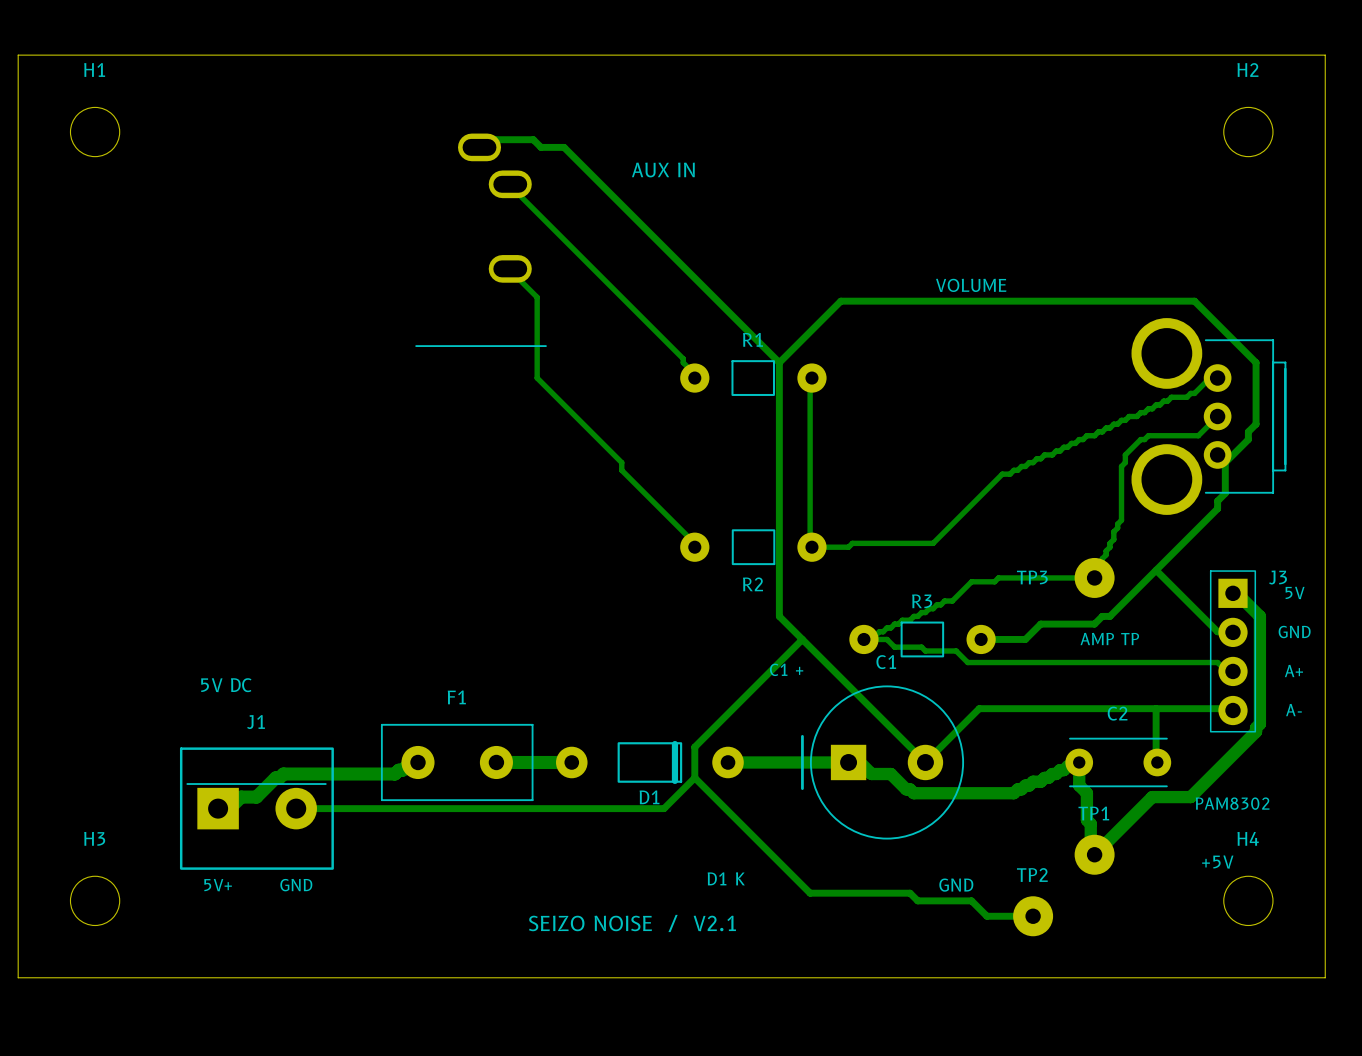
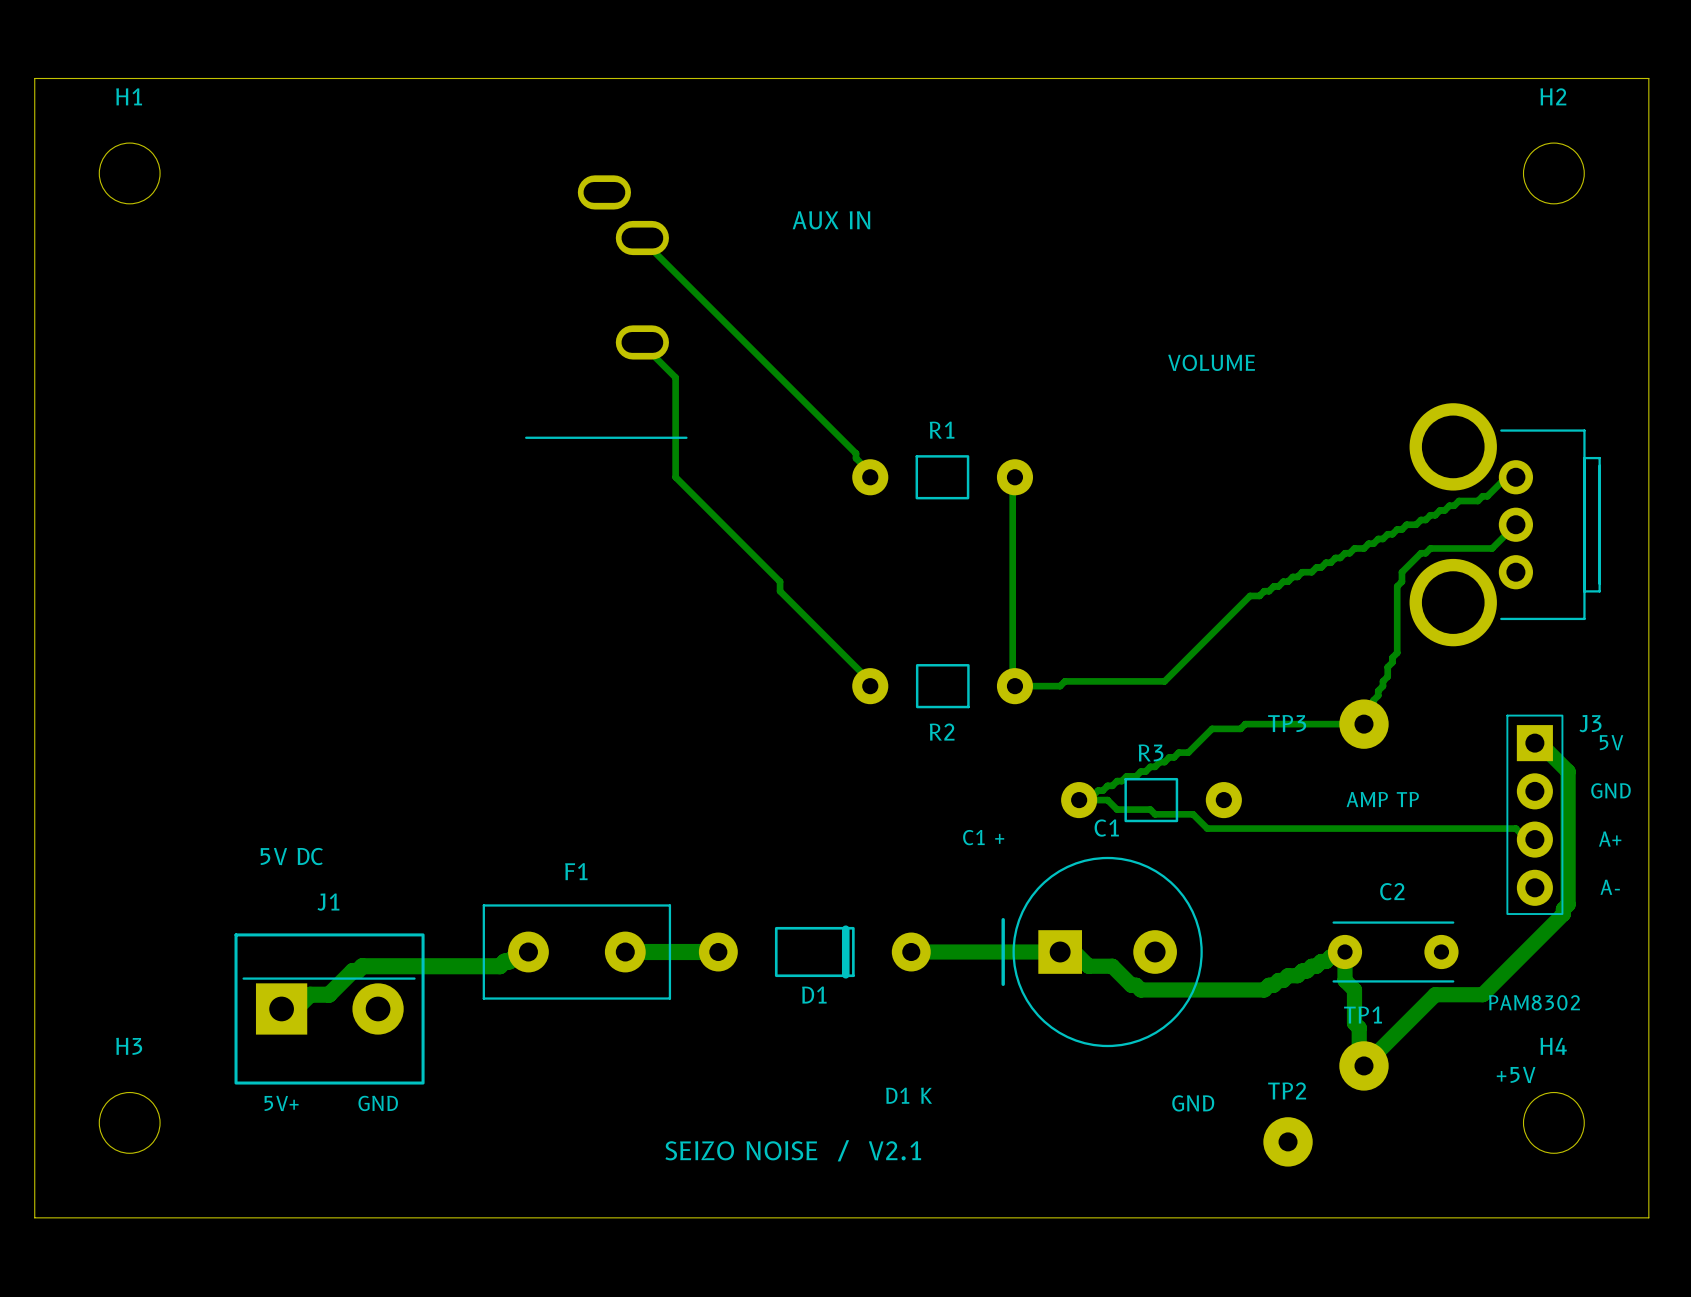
bottom track: (479, 147) (487, 147) (494, 139) (533, 139) (541, 147) (564, 147) (779, 362) -> none
bottom track: (779, 362) (840, 301) (1194, 301) (1256, 362) (1256, 424) (1248, 431) (1248, 439) (1225, 462) -> none
bottom track: (779, 362) (779, 616) (925, 762) (979, 708) (1233, 708) (1233, 710) -> none
bottom track: (1225, 462) (1225, 493) (1217, 501) (1217, 508) (1109, 616) (1102, 616) (1094, 624) (1040, 624) (1025, 639) (979, 639) -> none
bottom track: (1156, 570) (1217, 631) (1233, 632) -> none
bottom track: (802, 639) (694, 747) (694, 777) -> none
bottom track: (1156, 708) (1157, 762) -> none
bottom track: (694, 777) (664, 808) (294, 808) -> none
bottom track: (694, 777) (810, 893) (910, 893) (917, 900) (971, 900) (986, 916) (1033, 916) -> none

